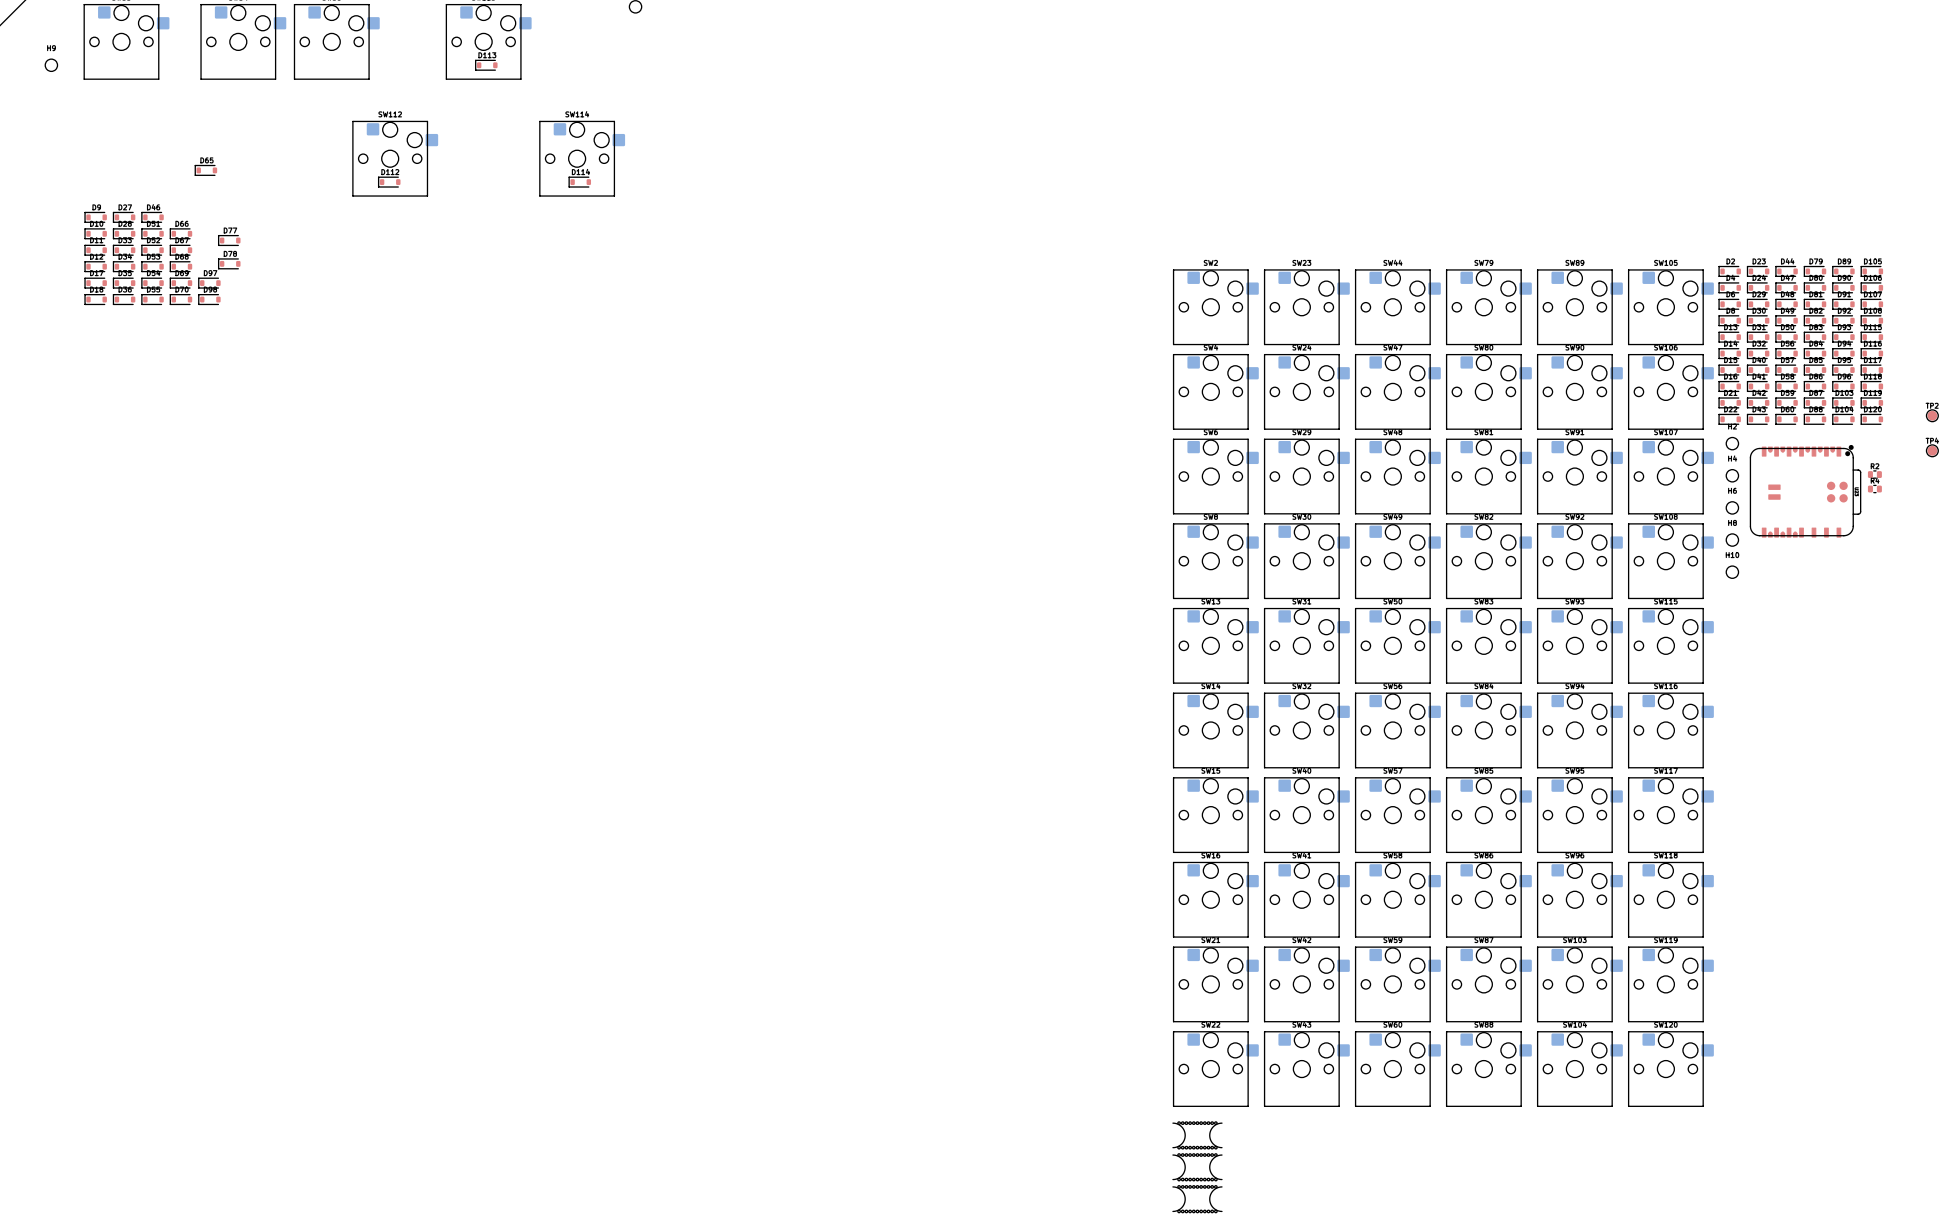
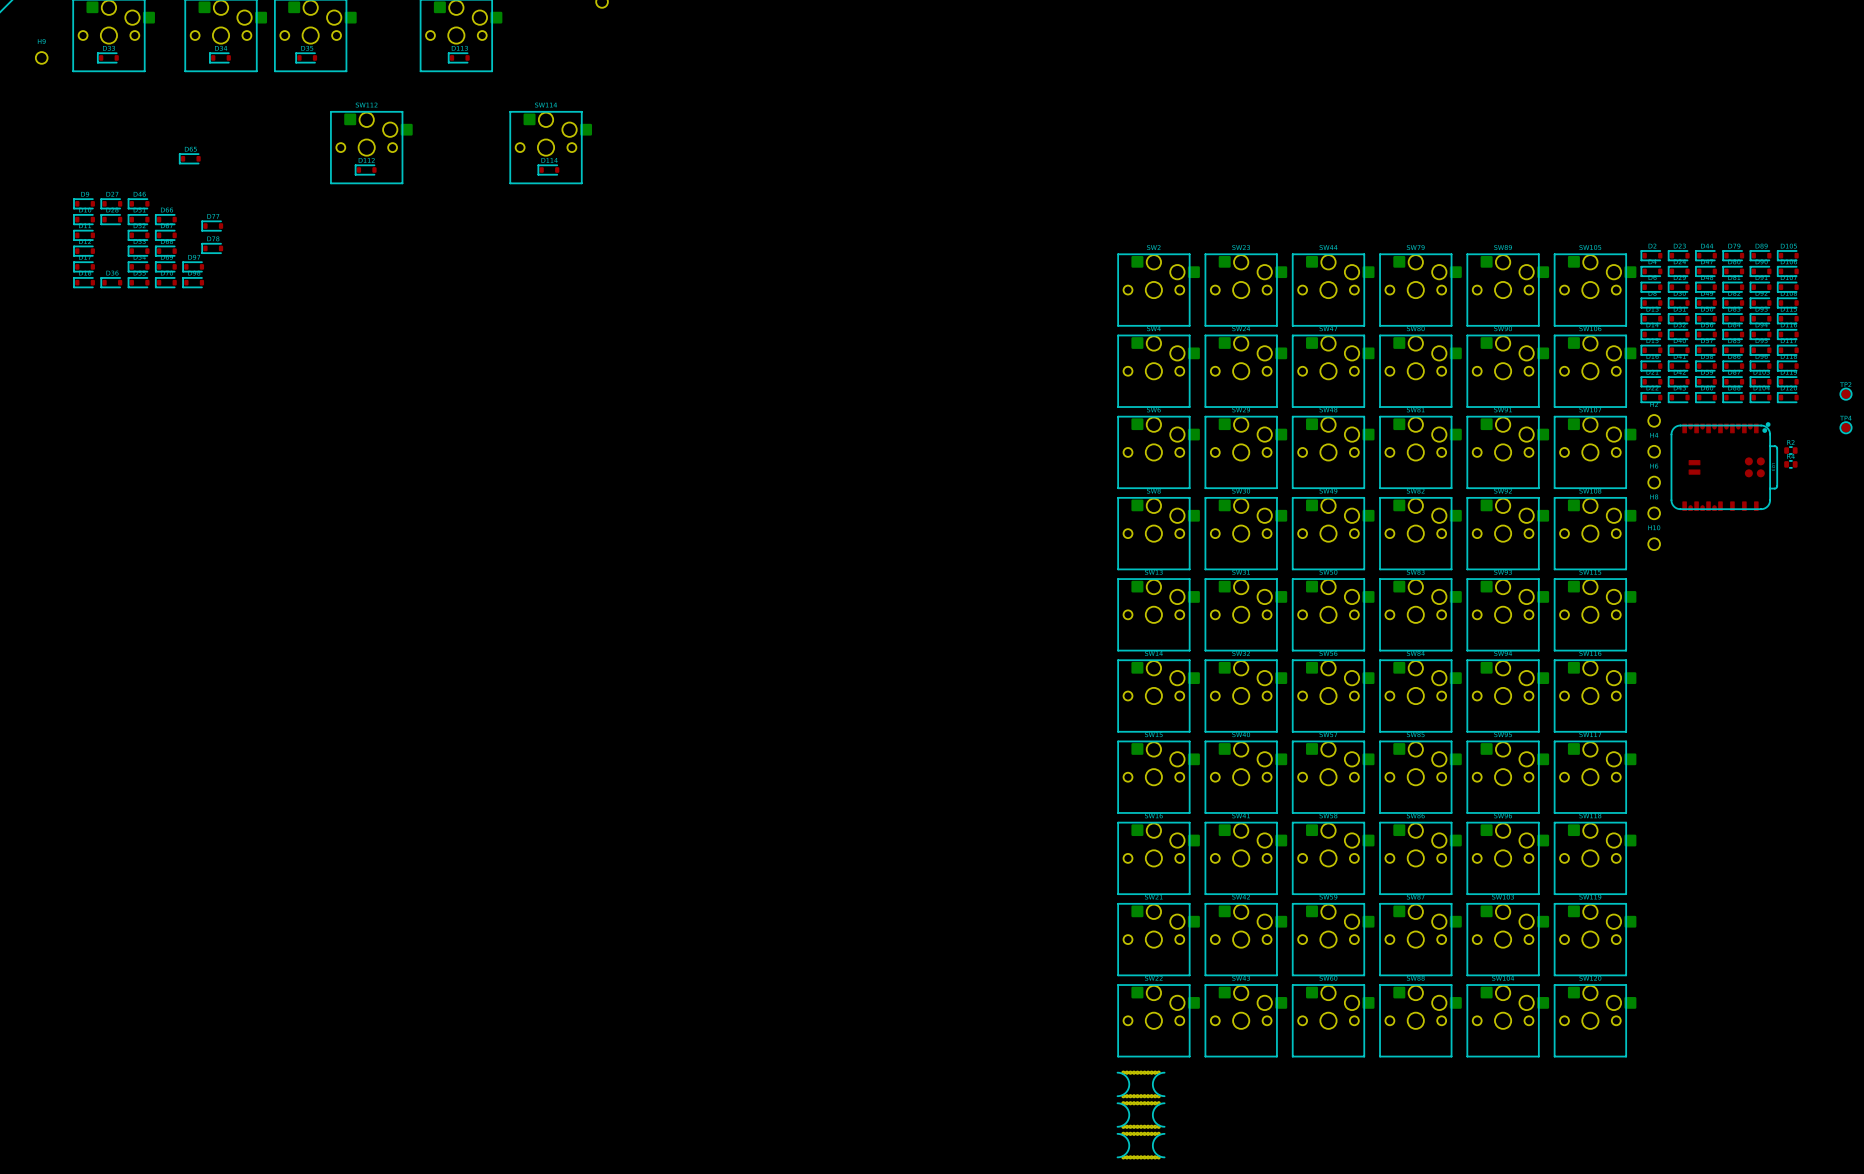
part position: (124, 250) -> (108, 57)
part position: (124, 266) -> (220, 57)
part position: (124, 283) -> (306, 57)

